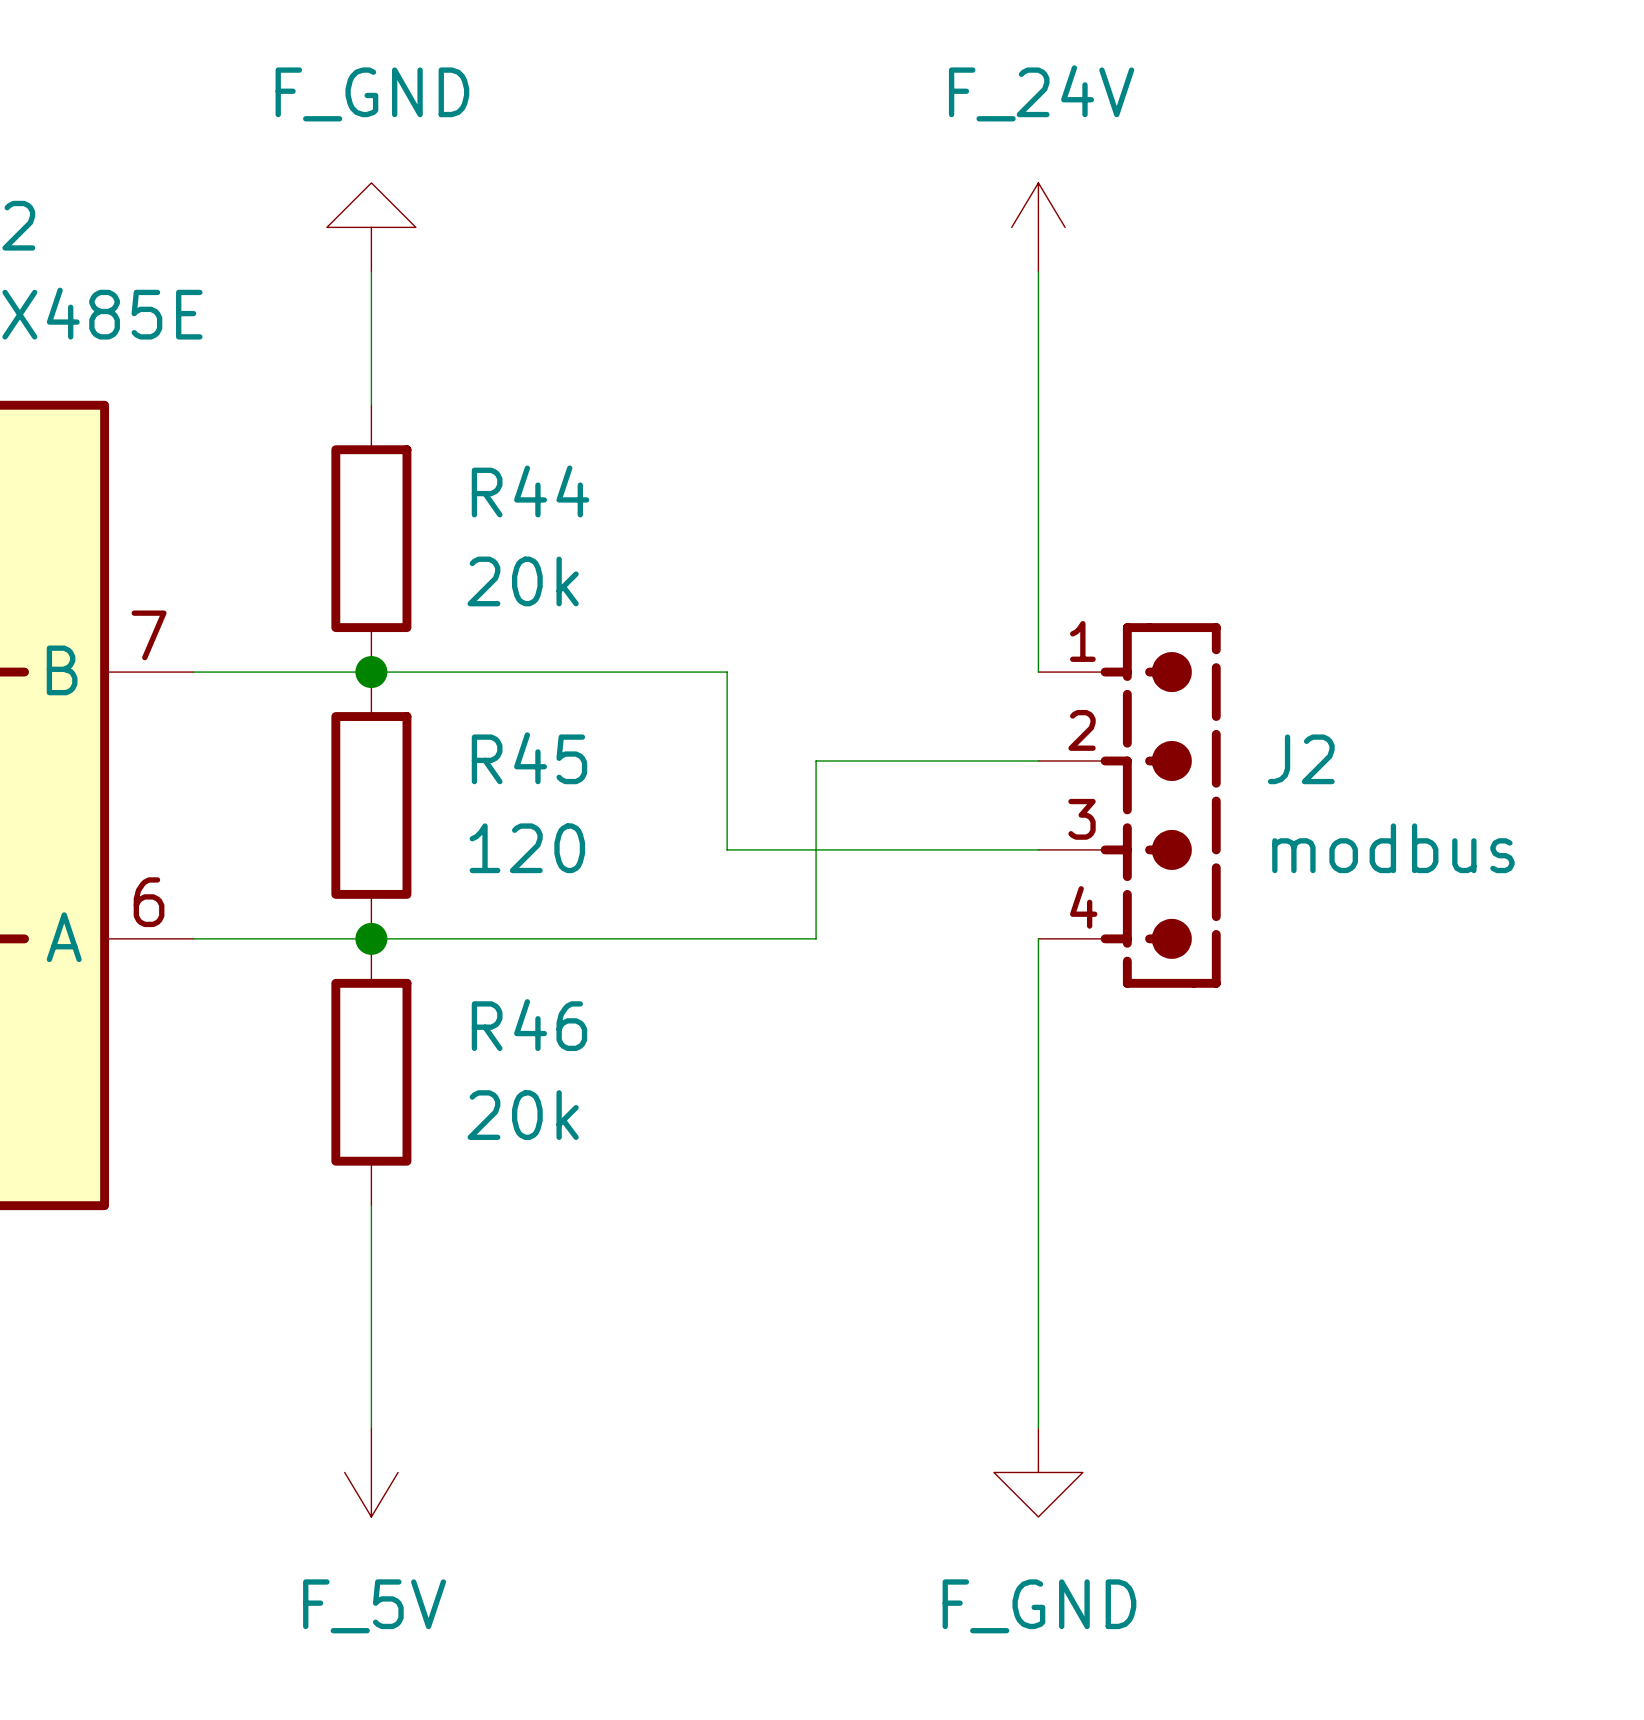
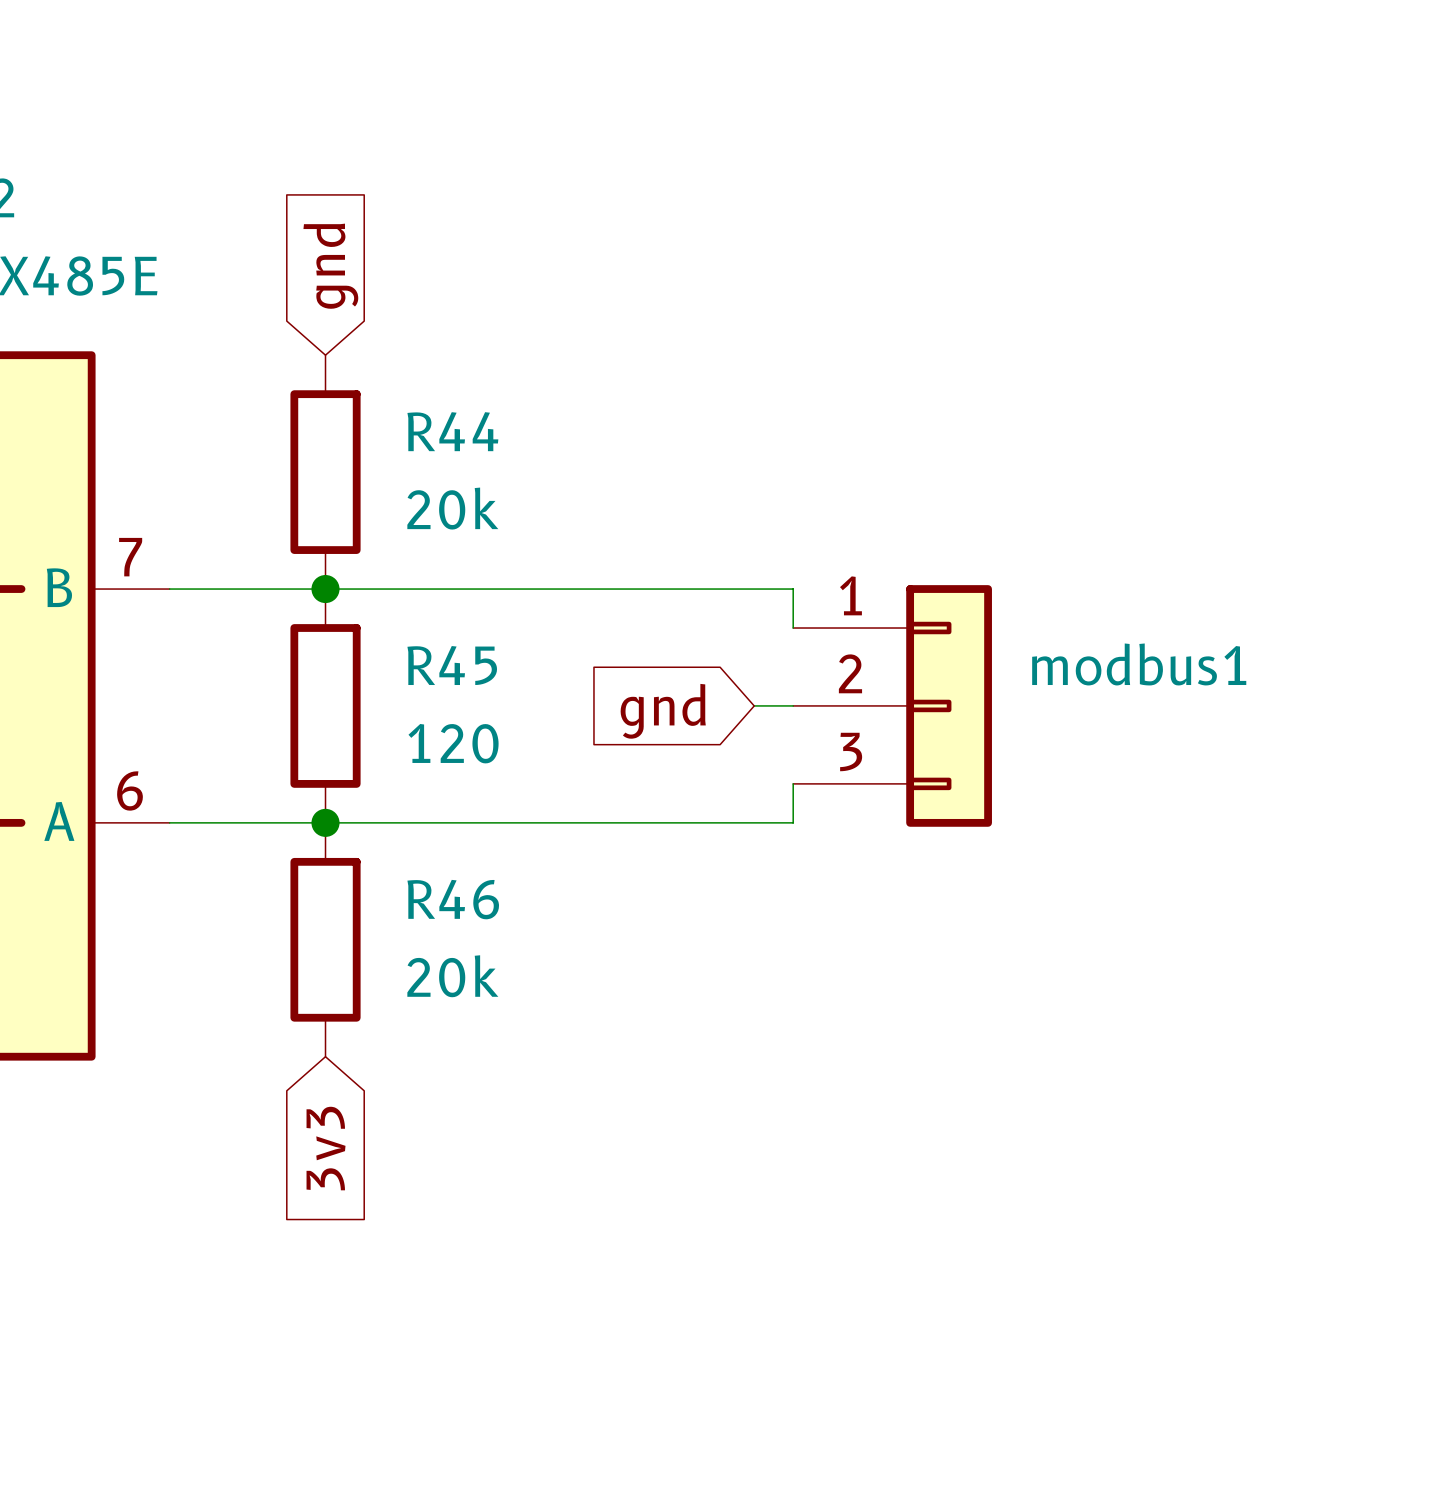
power symbol: F_GND (371, 227) -> none
power symbol: F_24V (1038, 227) -> none
wire: (371, 271) (371, 405) -> none
wire: (1038, 271) (1038, 672) -> none
global label: none -> gnd (330, 266)
wire: (727, 672) (727, 849) (1038, 849) -> (637, 589) (793, 589) (793, 628)
wire: (1038, 761) (816, 761) (816, 938) -> (793, 783) (793, 822) (715, 822)
wire: none -> (754, 705) (793, 705)
modbus1: none -> (892, 705)
J2: modbus (1129, 805) -> none
global label: none -> gnd (663, 711)
wire: (1038, 938) (1038, 1428) -> none
wire: (371, 1205) (371, 1428) -> none
global label: none -> 3v3 (326, 1148)
power symbol: F_5V (371, 1472) -> none
power symbol: F_GND (1038, 1472) -> none

